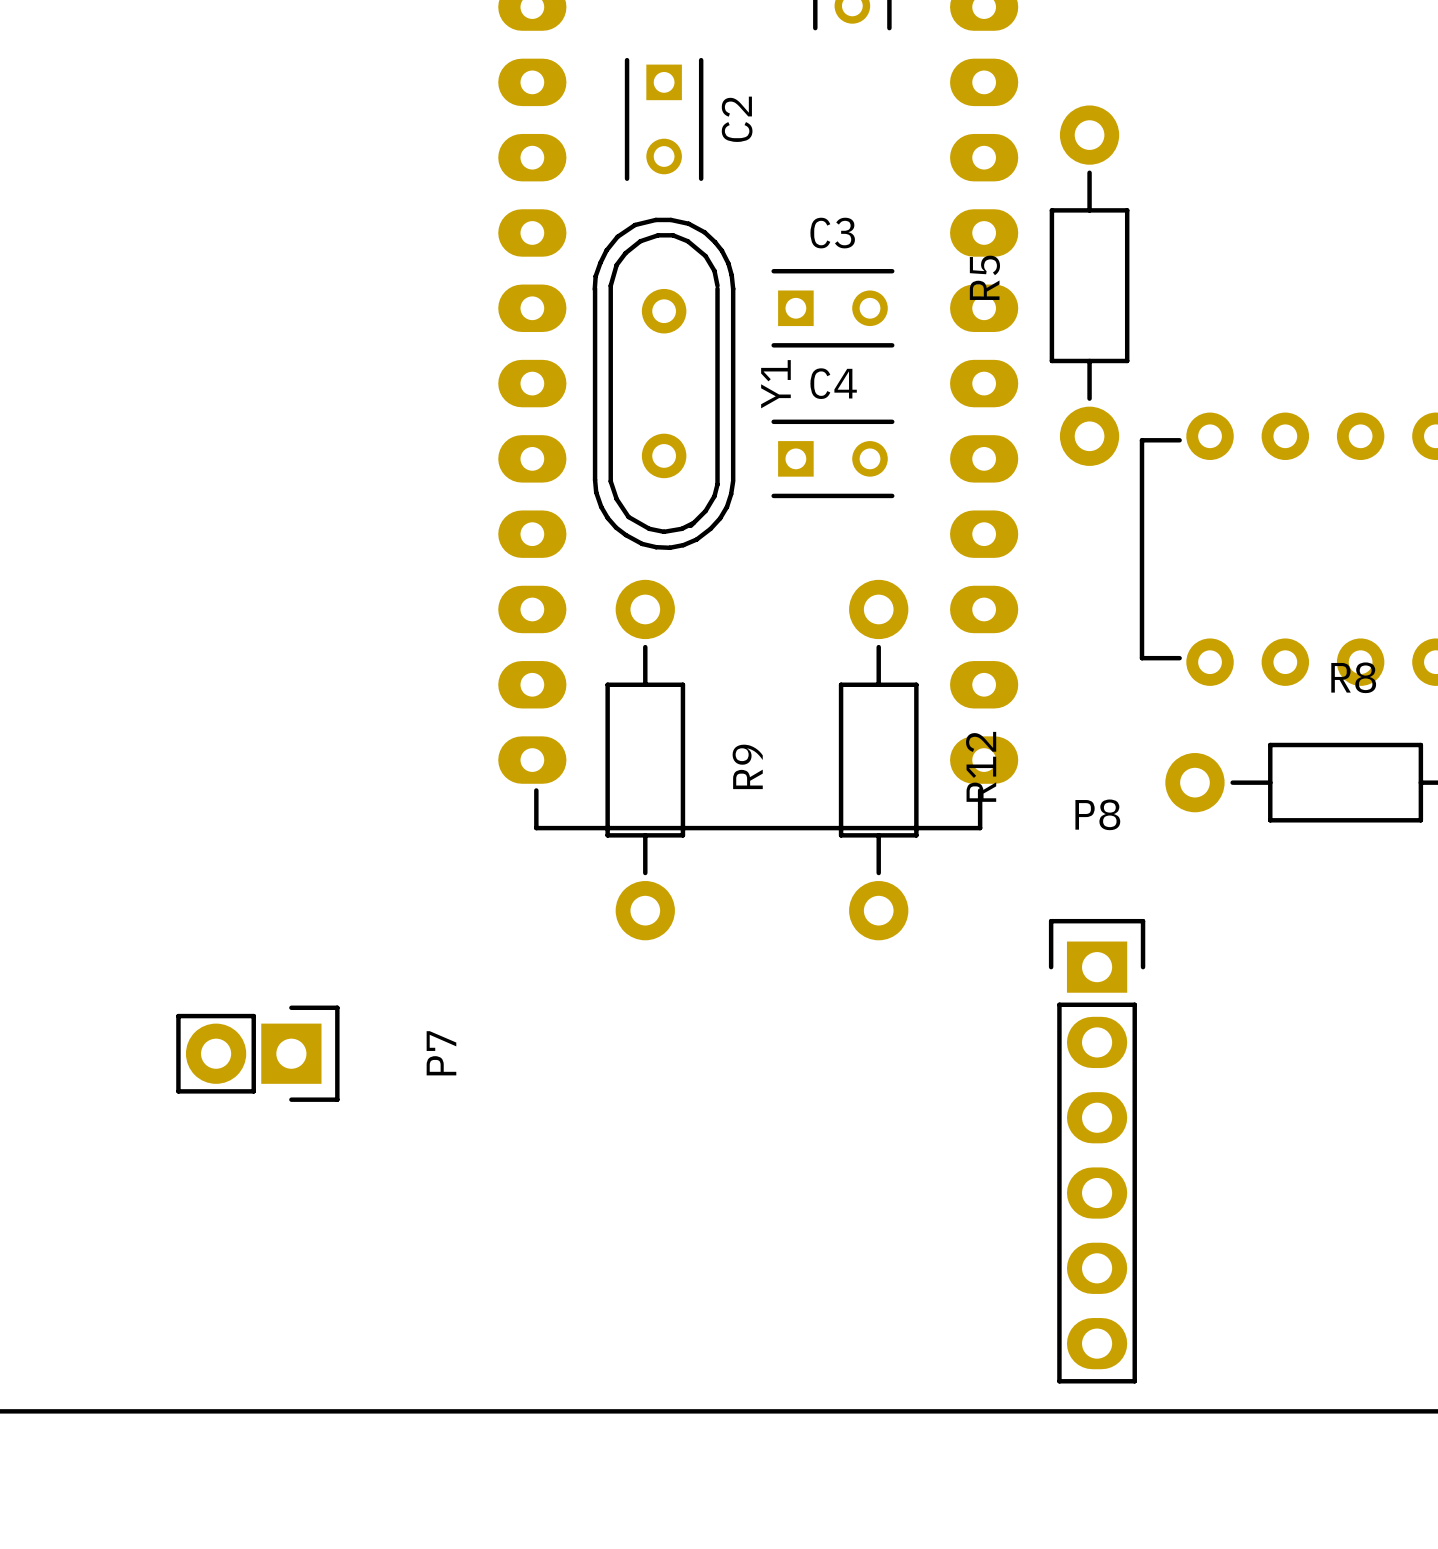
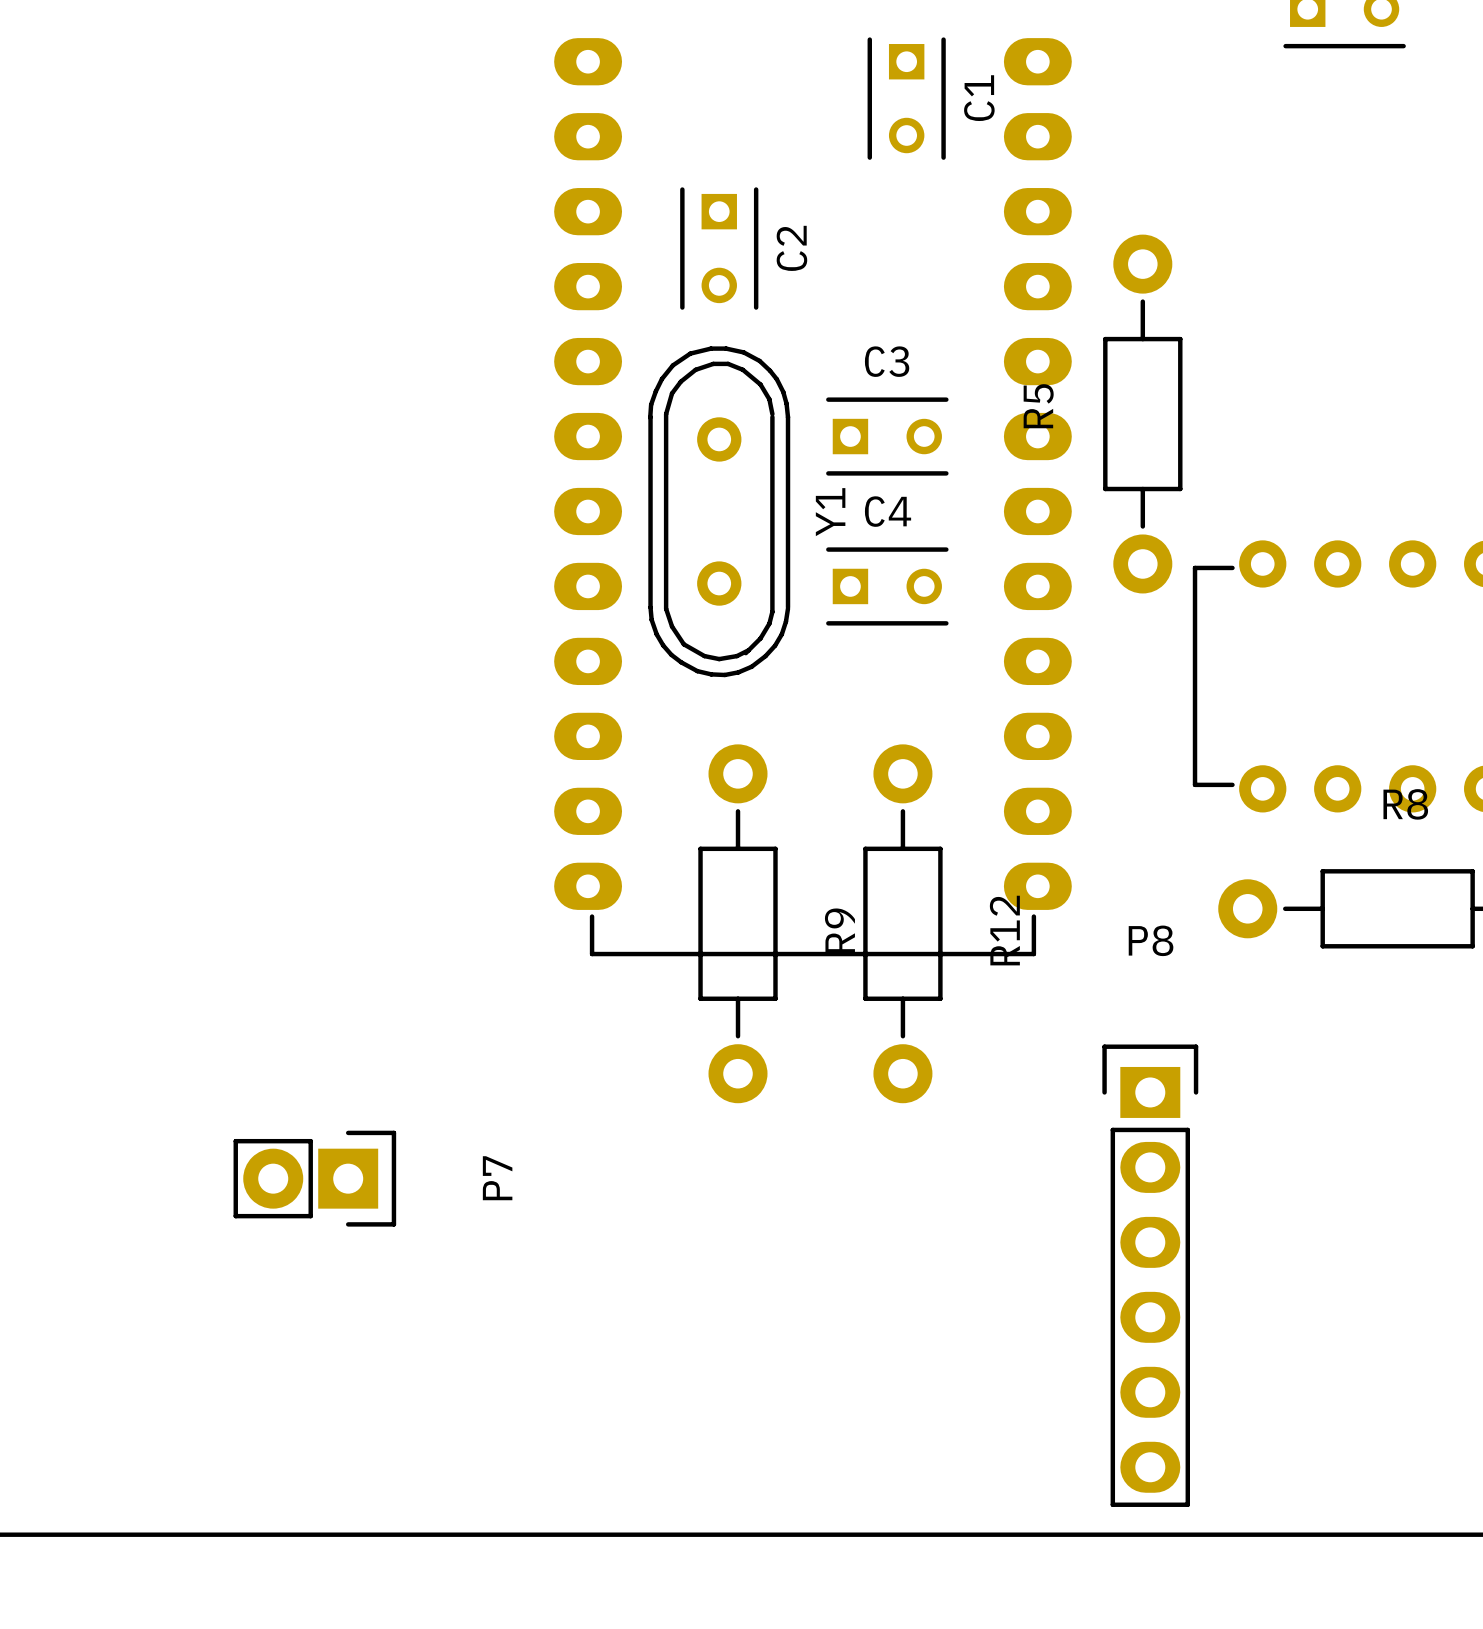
R9 position: (645, 760) -> (738, 923)
R12 position: (878, 760) -> (902, 923)

